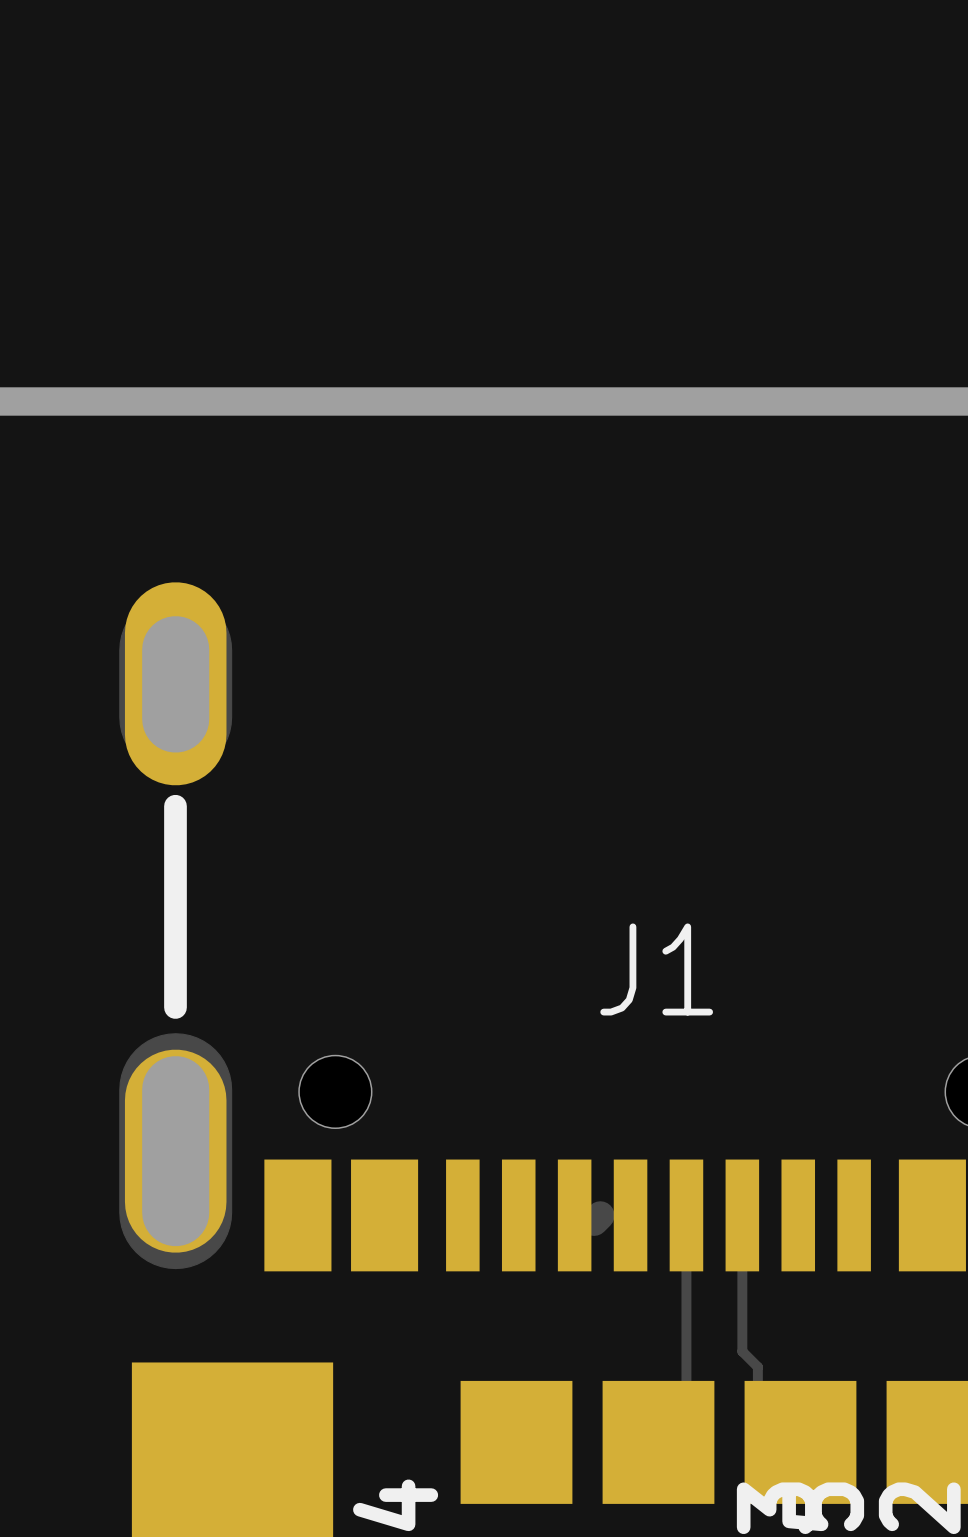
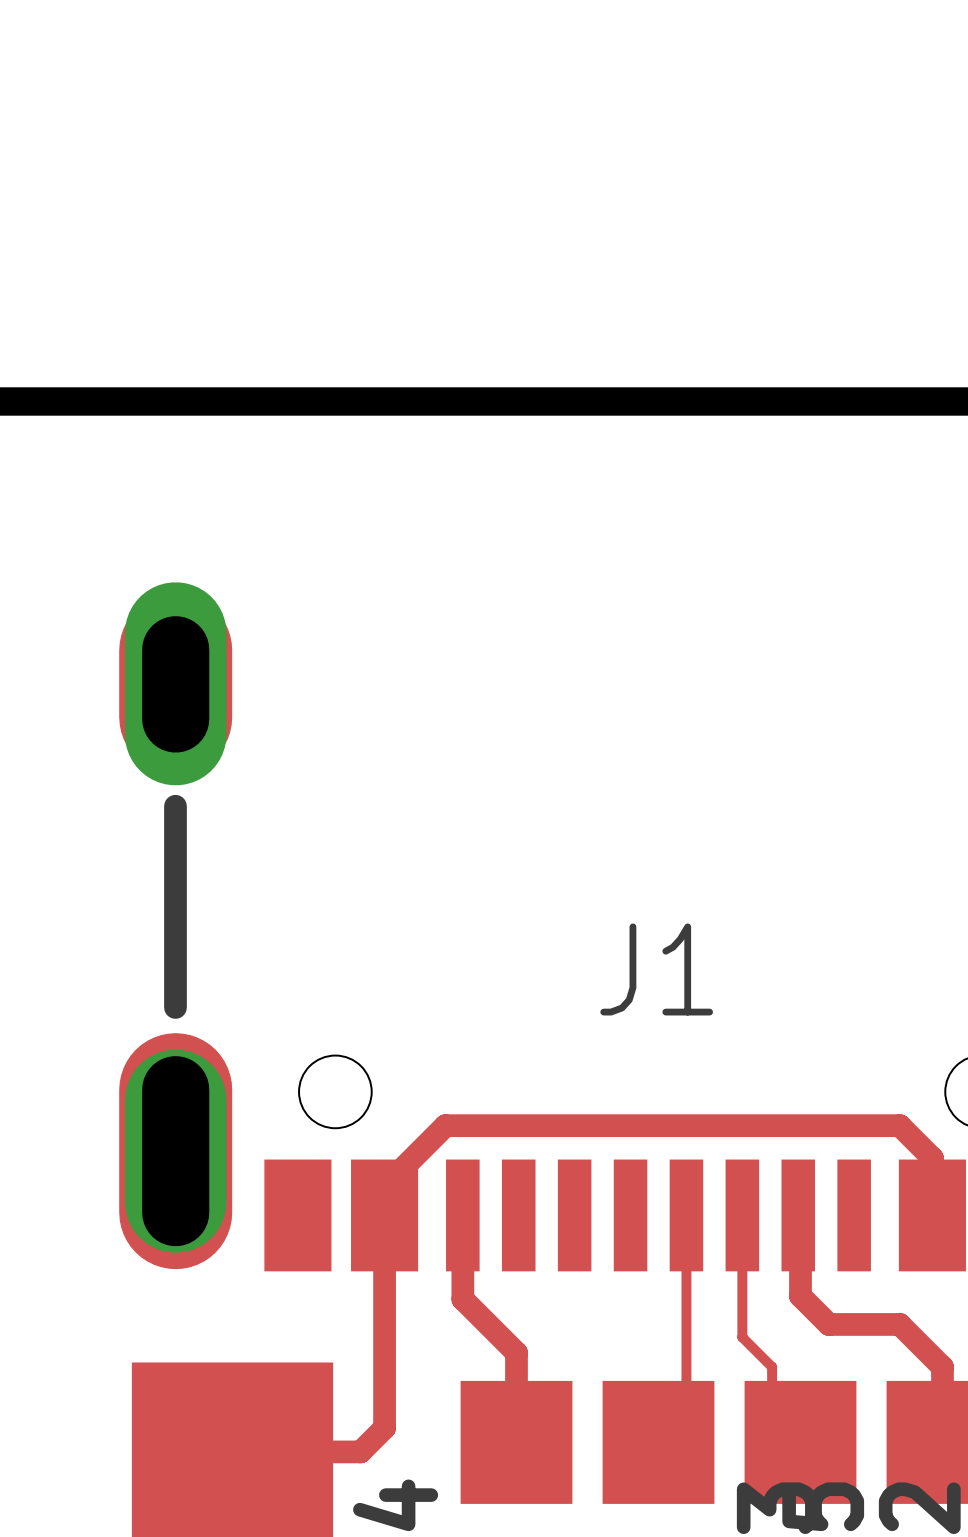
track: none -> (384, 1215) (384, 1186) (445, 1125) (899, 1125) (932, 1158) (932, 1215)
track: none -> (462, 1215) (462, 1299) (516, 1352) (516, 1442)
track: (600, 1215) (594, 1221) -> none
track: none -> (800, 1217) (800, 1296) (828, 1324) (899, 1324) (942, 1367) (942, 1442)
track: none -> (384, 1253) (384, 1427) (360, 1451) (232, 1451)
track: (742, 1337) (742, 1351) (757, 1367) (757, 1395) -> (742, 1337) (772, 1367) (772, 1423)

